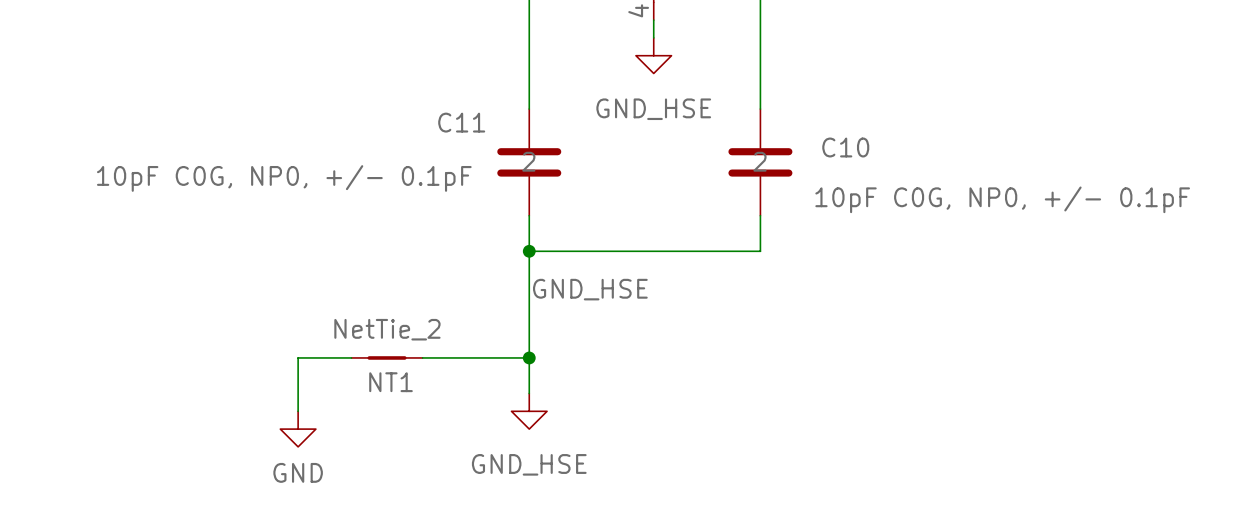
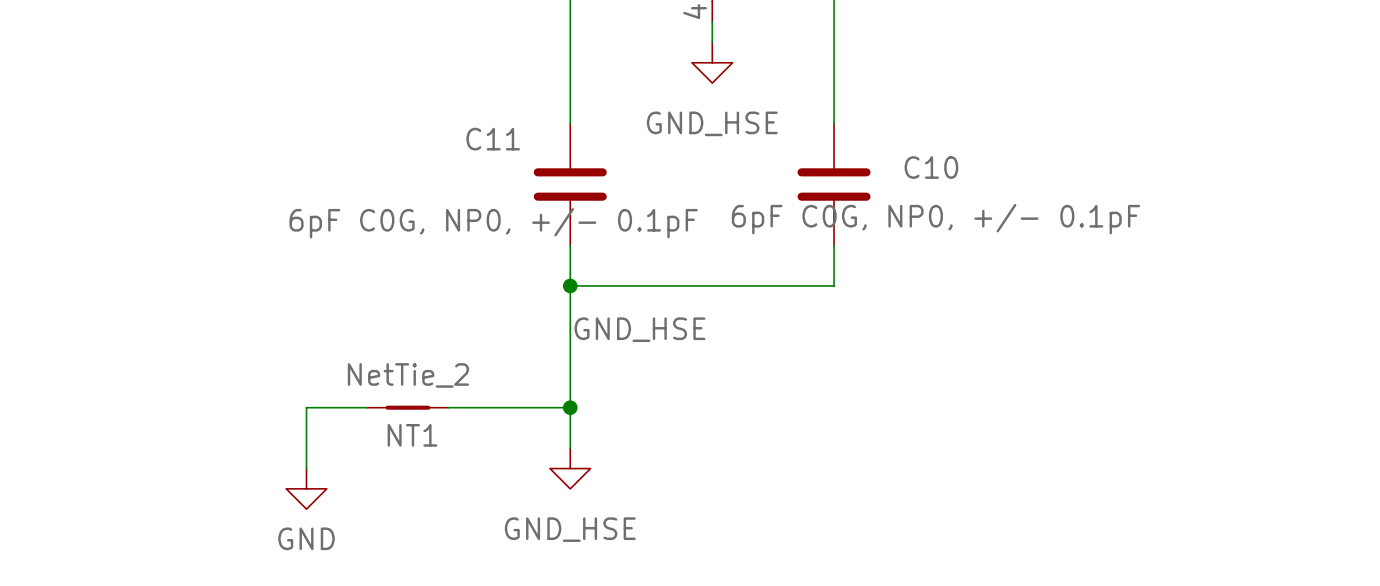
C11 text: 2 (528, 161) -> none
C10 text: 2 (759, 161) -> none
C11 value: 10pF C0G, NP0, +/- 0.1pF (284, 178) -> 6pF C0G, NP0, +/- 0.1pF (493, 223)
C10 value: 10pF C0G, NP0, +/- 0.1pF (1002, 199) -> 6pF C0G, NP0, +/- 0.1pF (935, 219)

